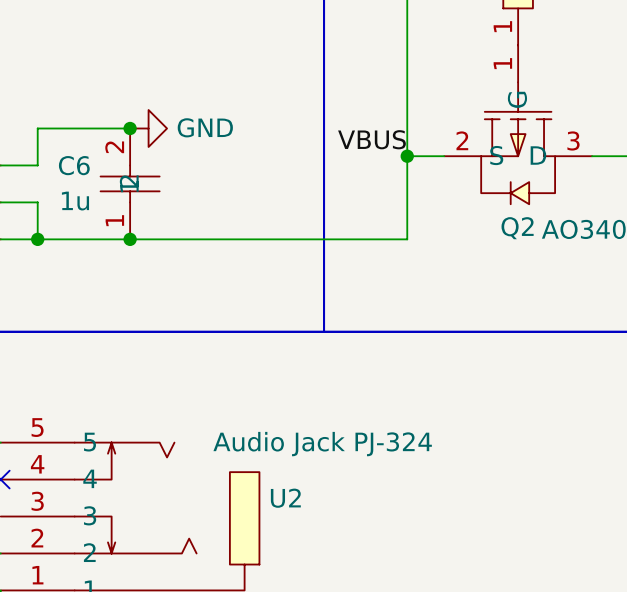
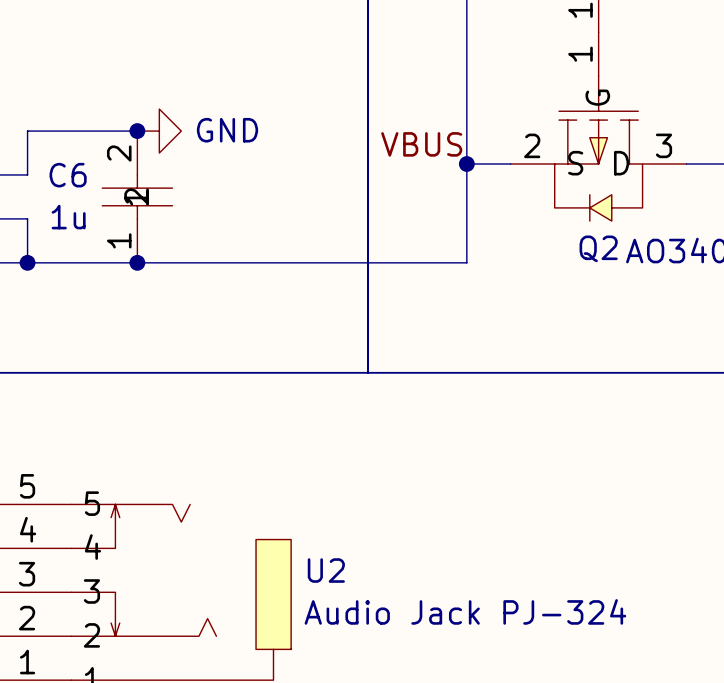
U2 value position: Audio Jack PJ-324 (322, 444) -> Audio Jack PJ-324 (465, 611)

